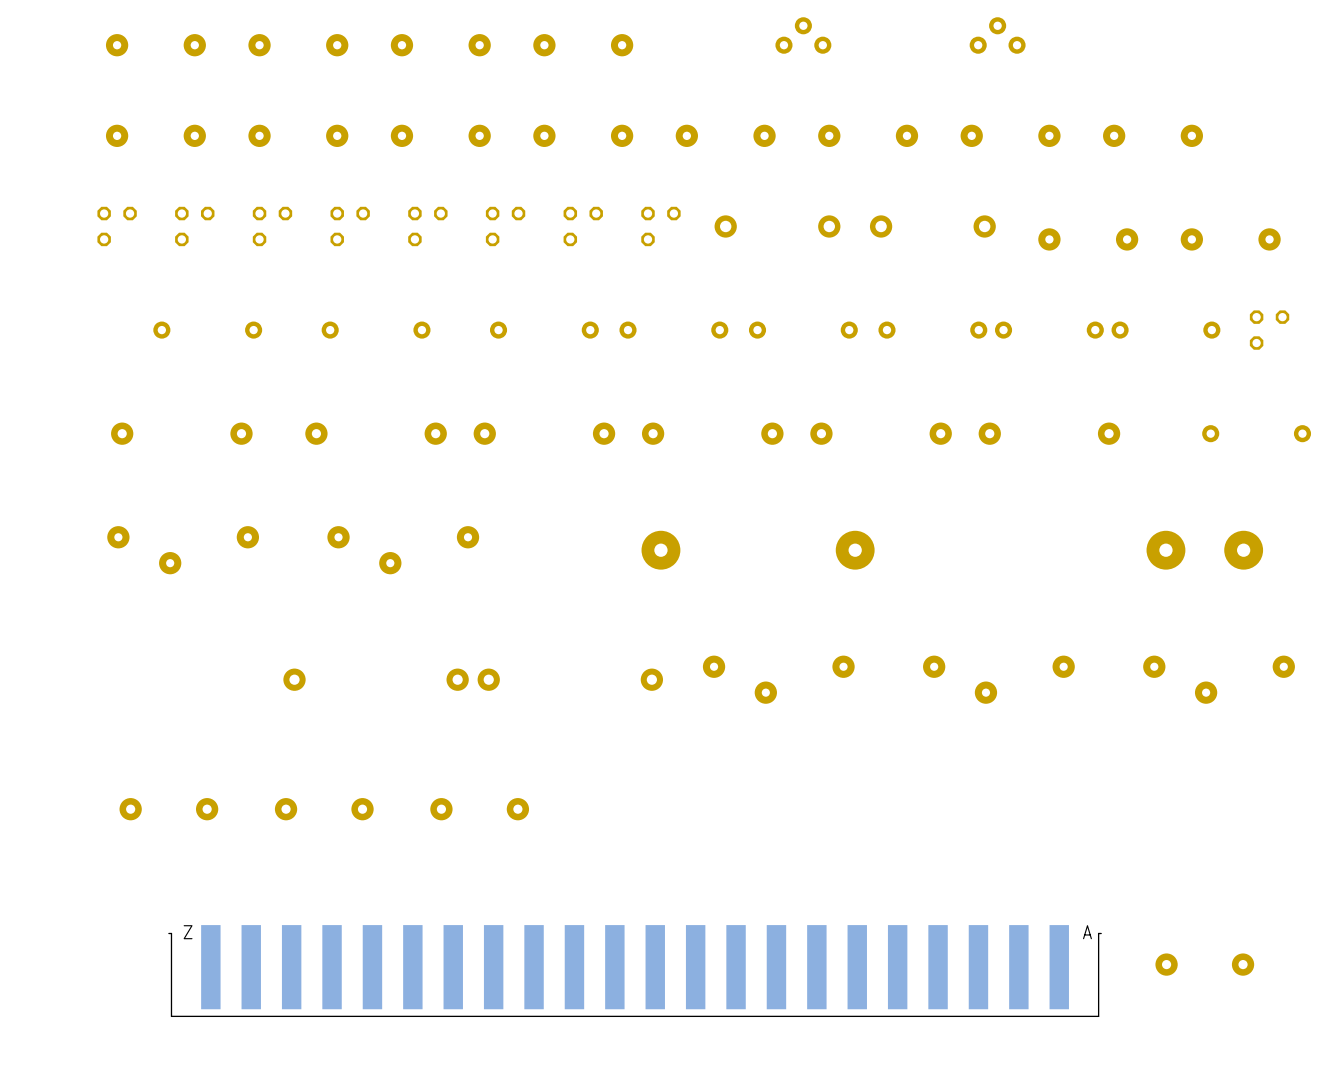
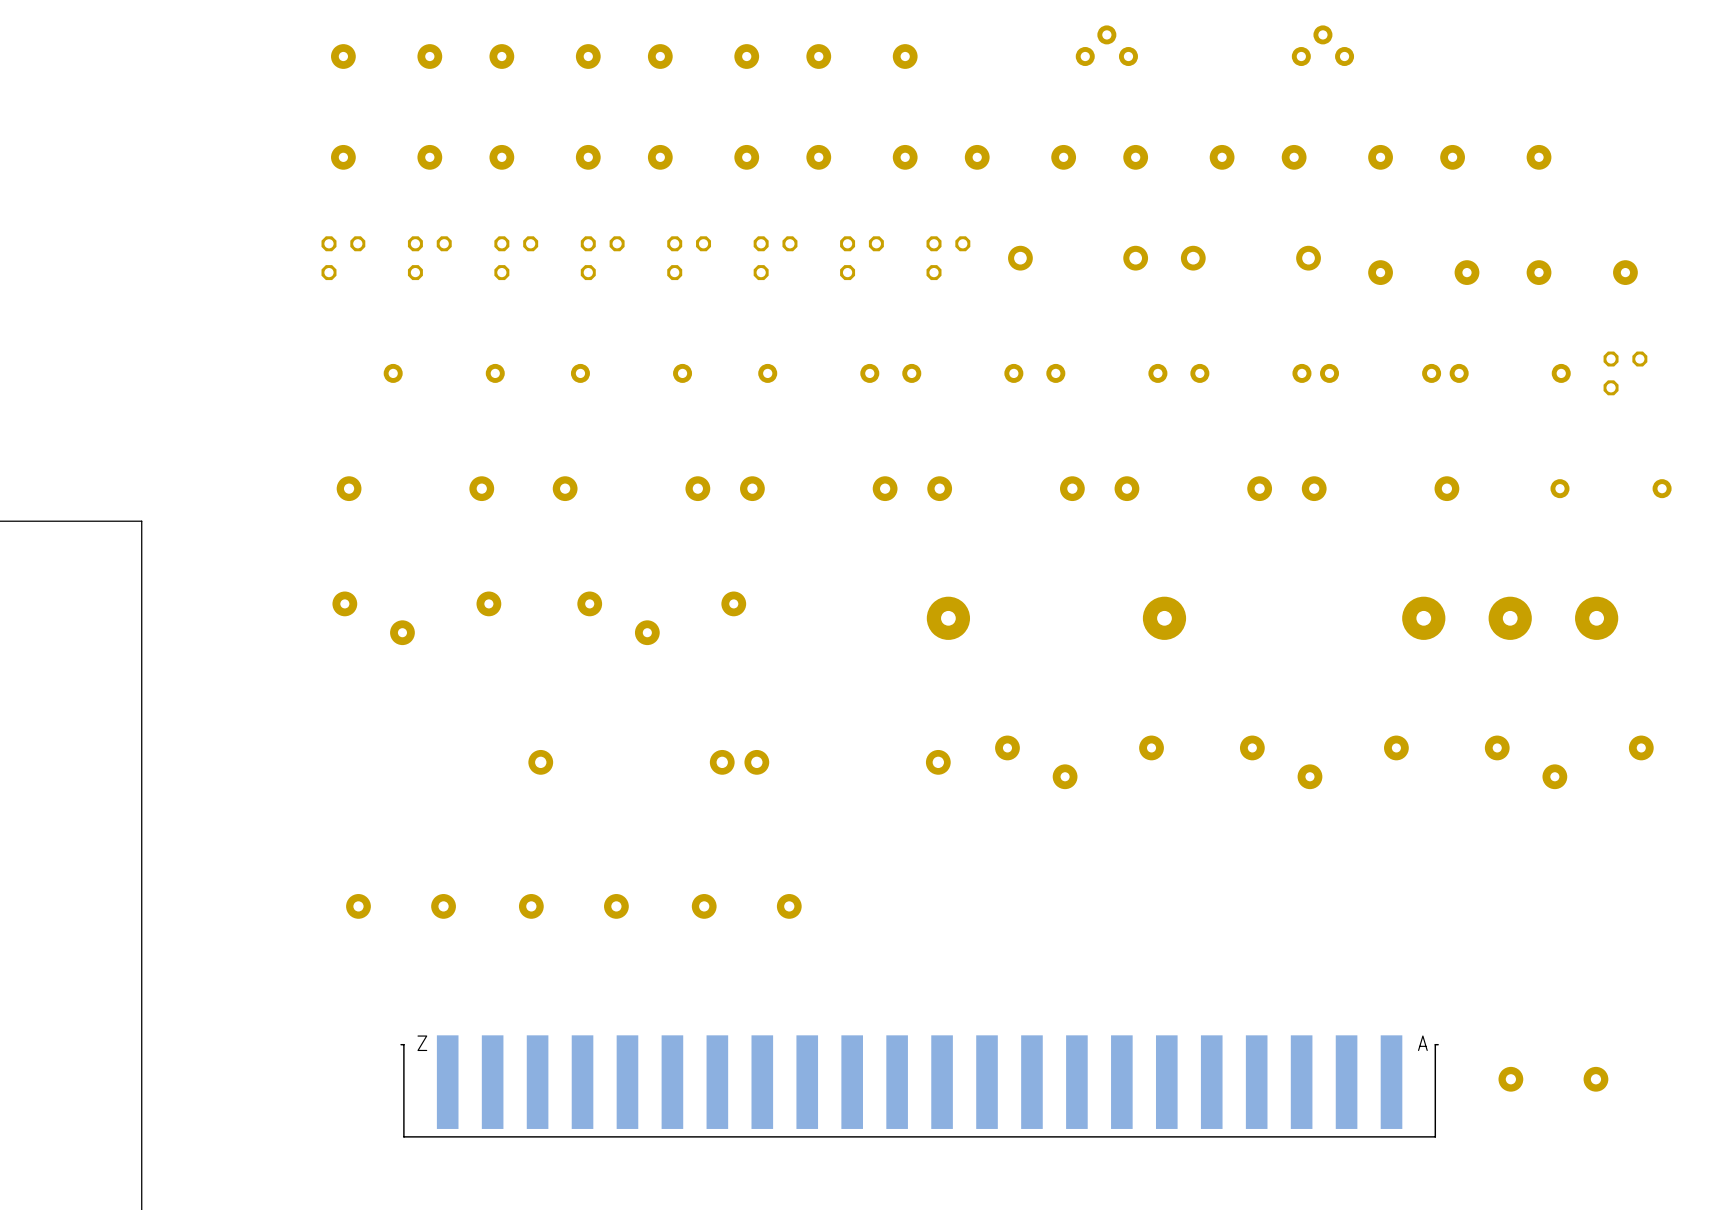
part: none -> (1423, 618)

